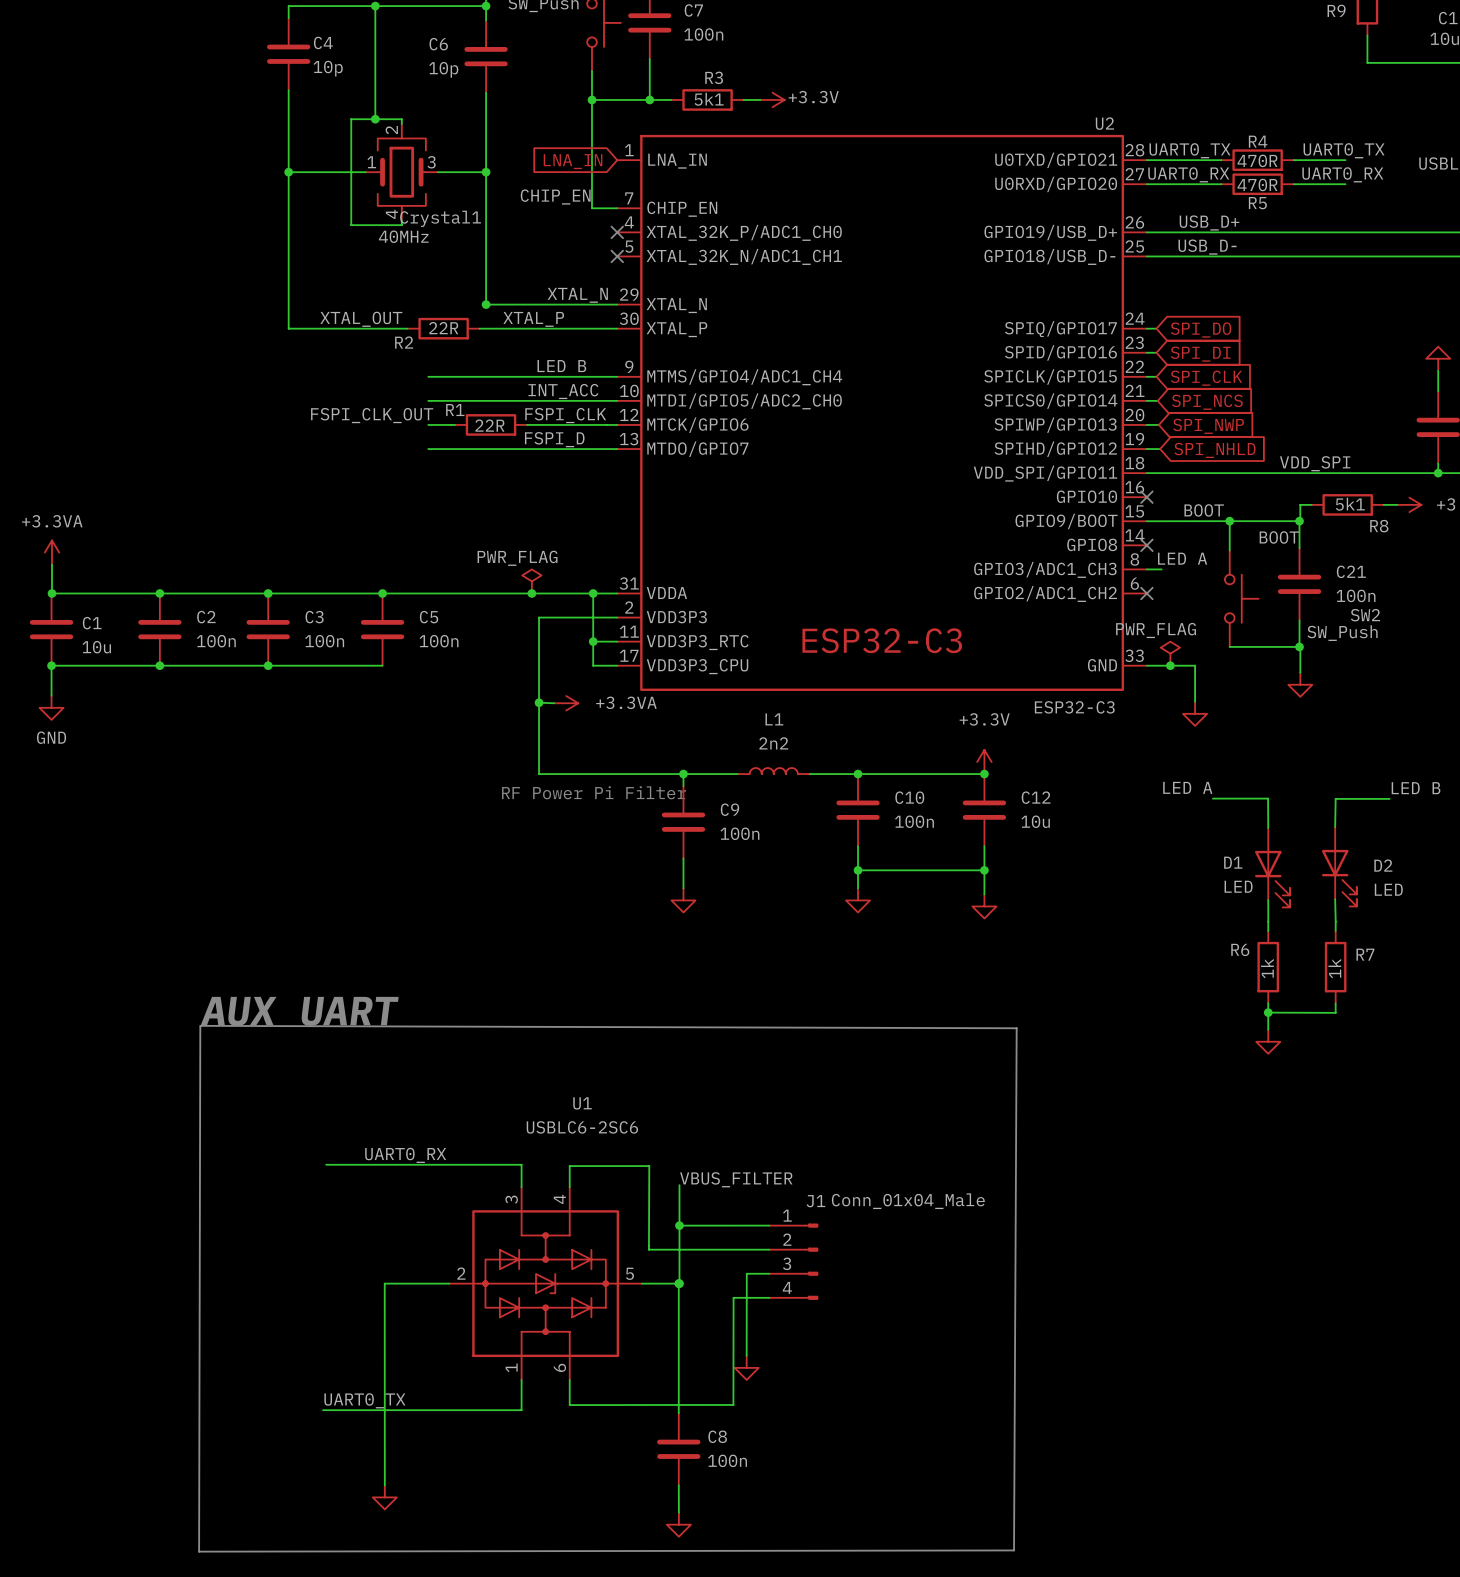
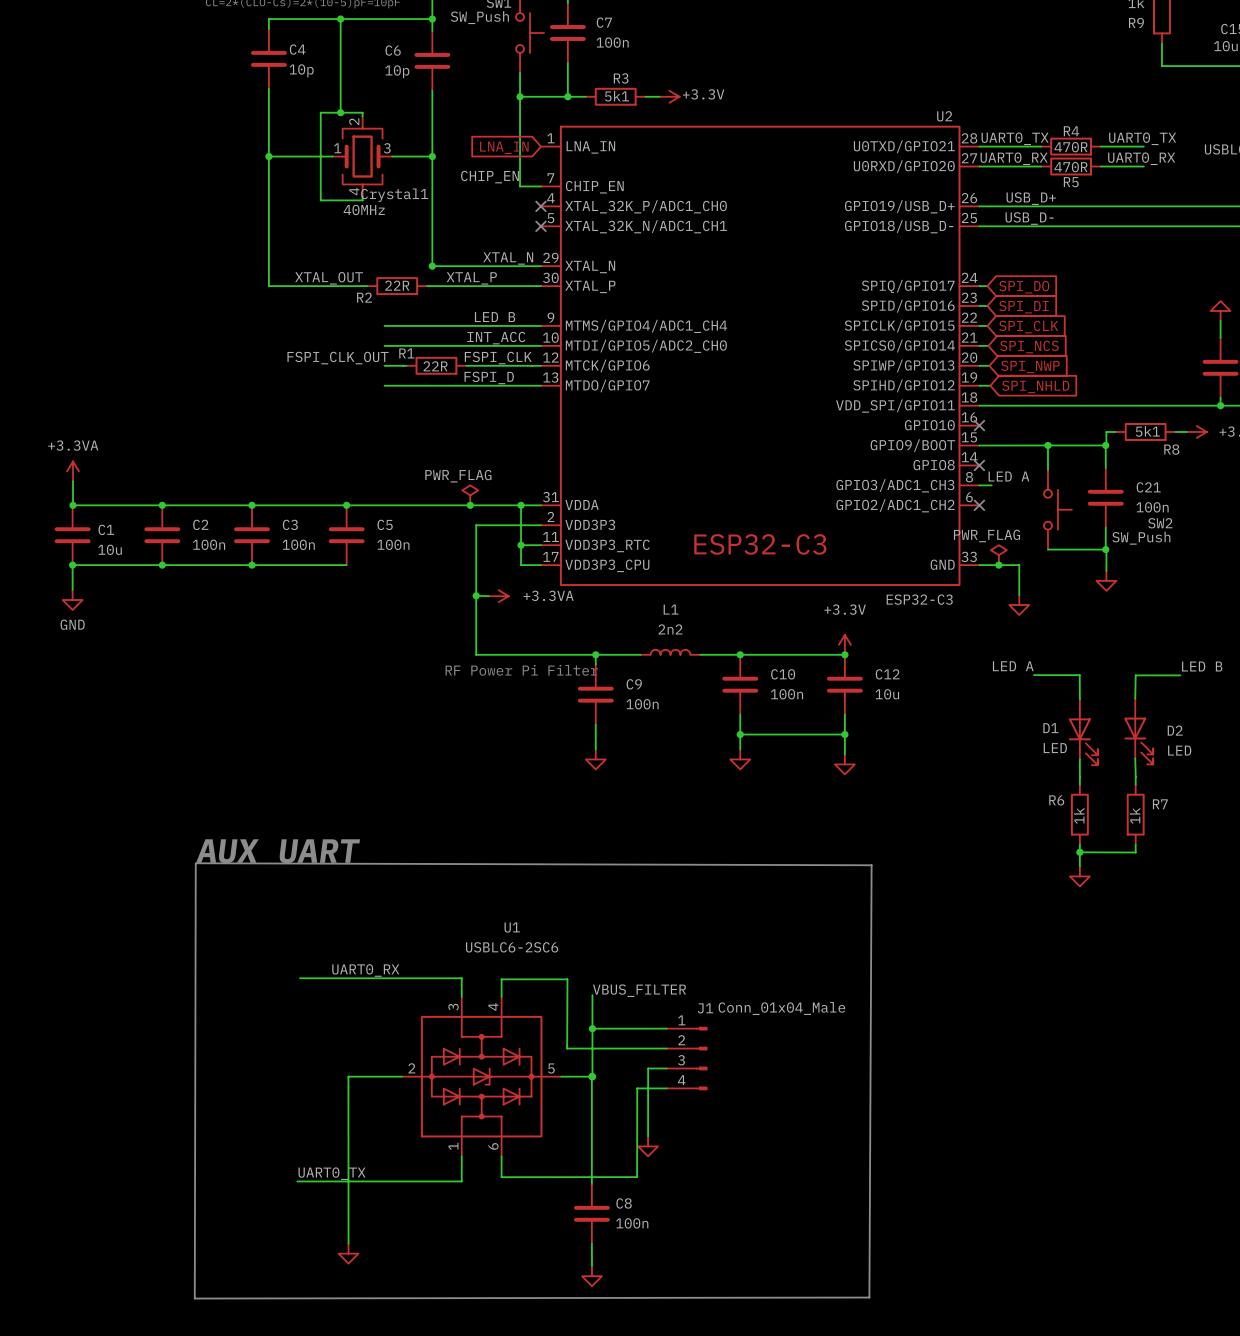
label: VDD_SPI (1315, 463) -> none
label: BOOT (1204, 510) -> none
label: BOOT (1279, 537) -> none

